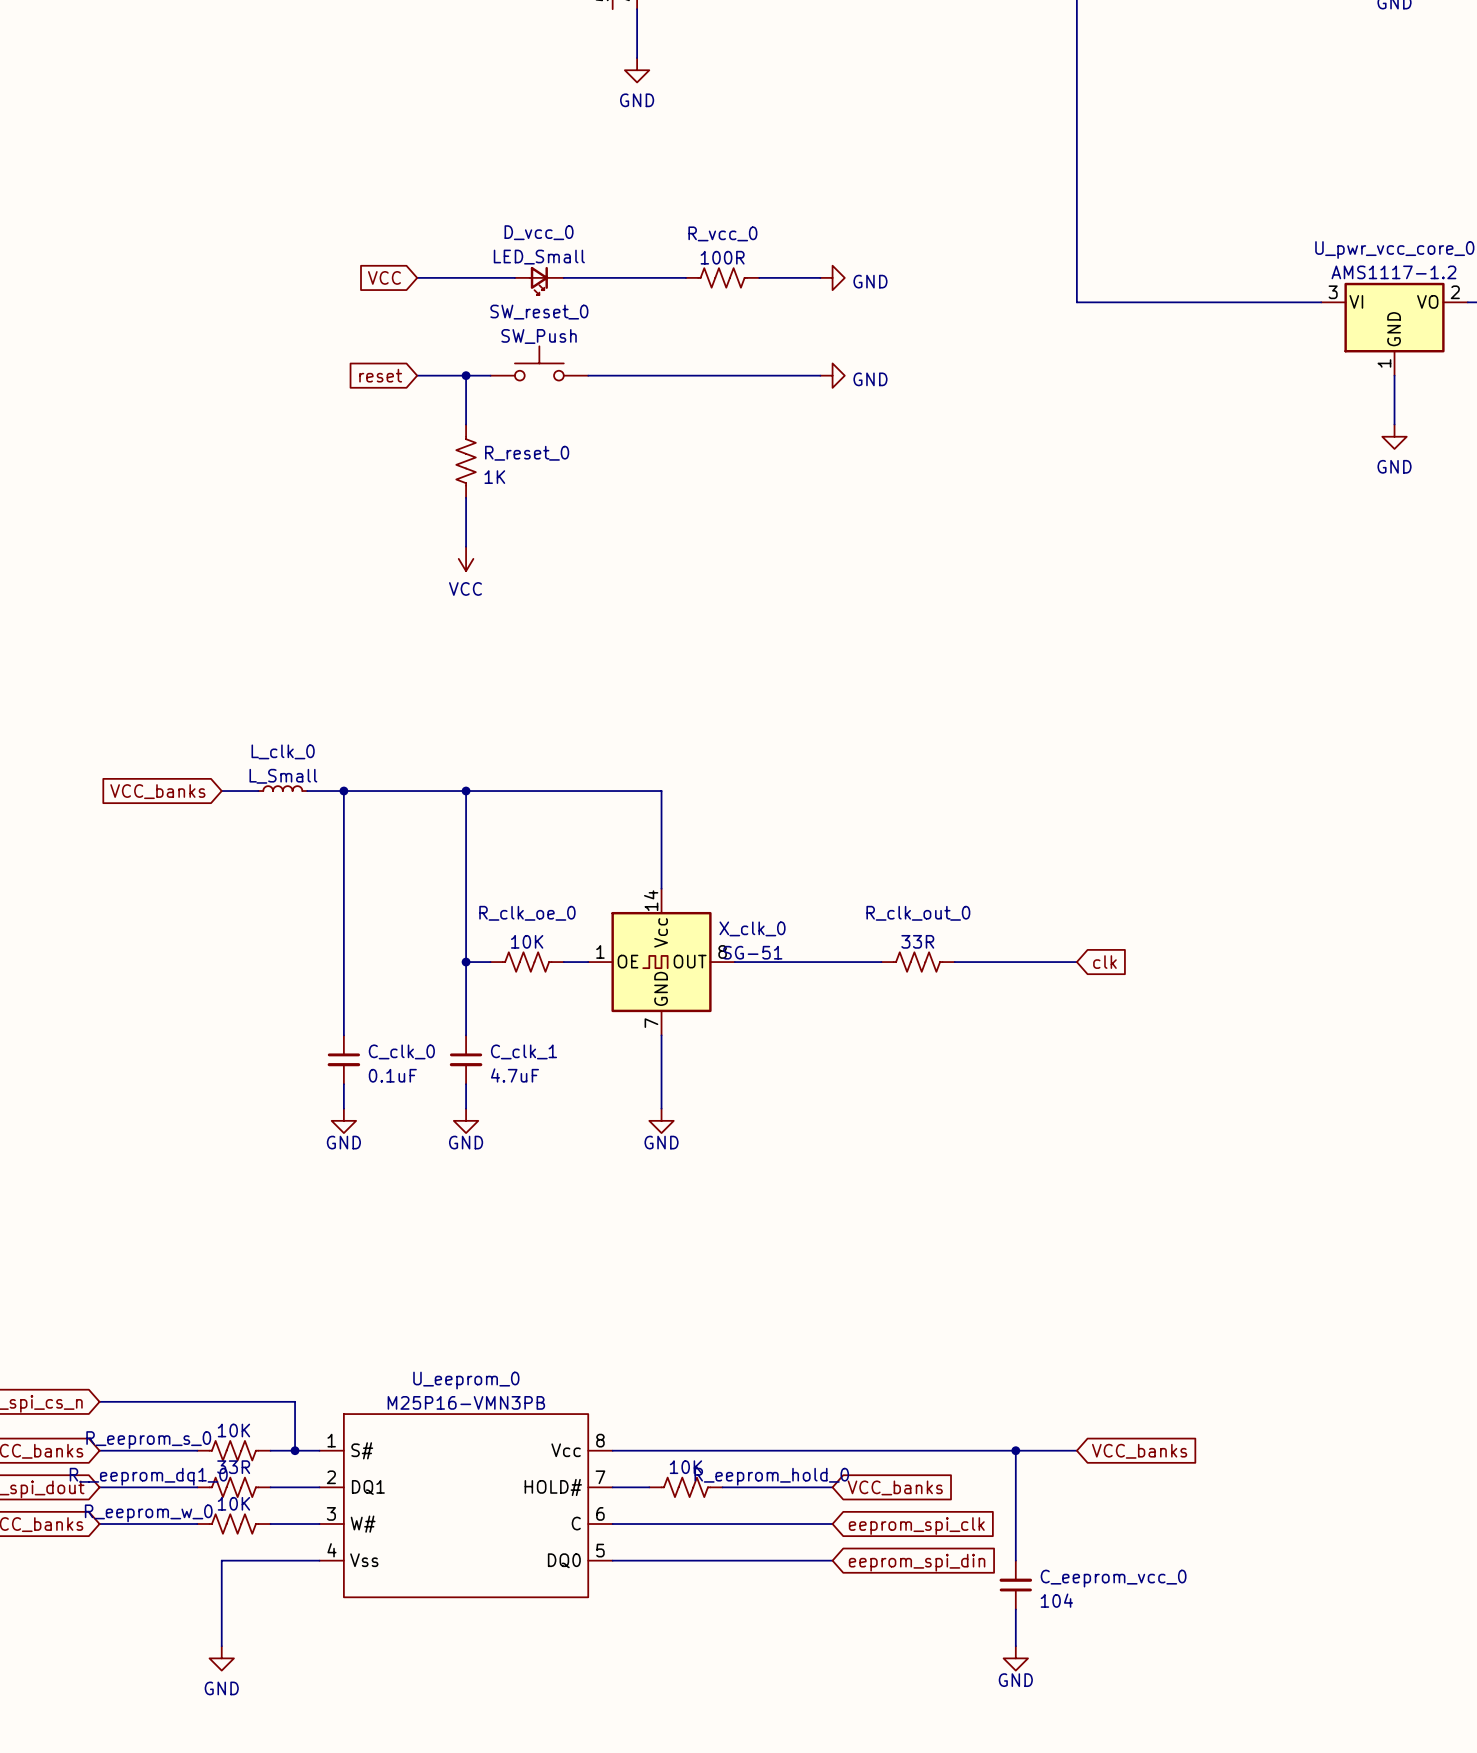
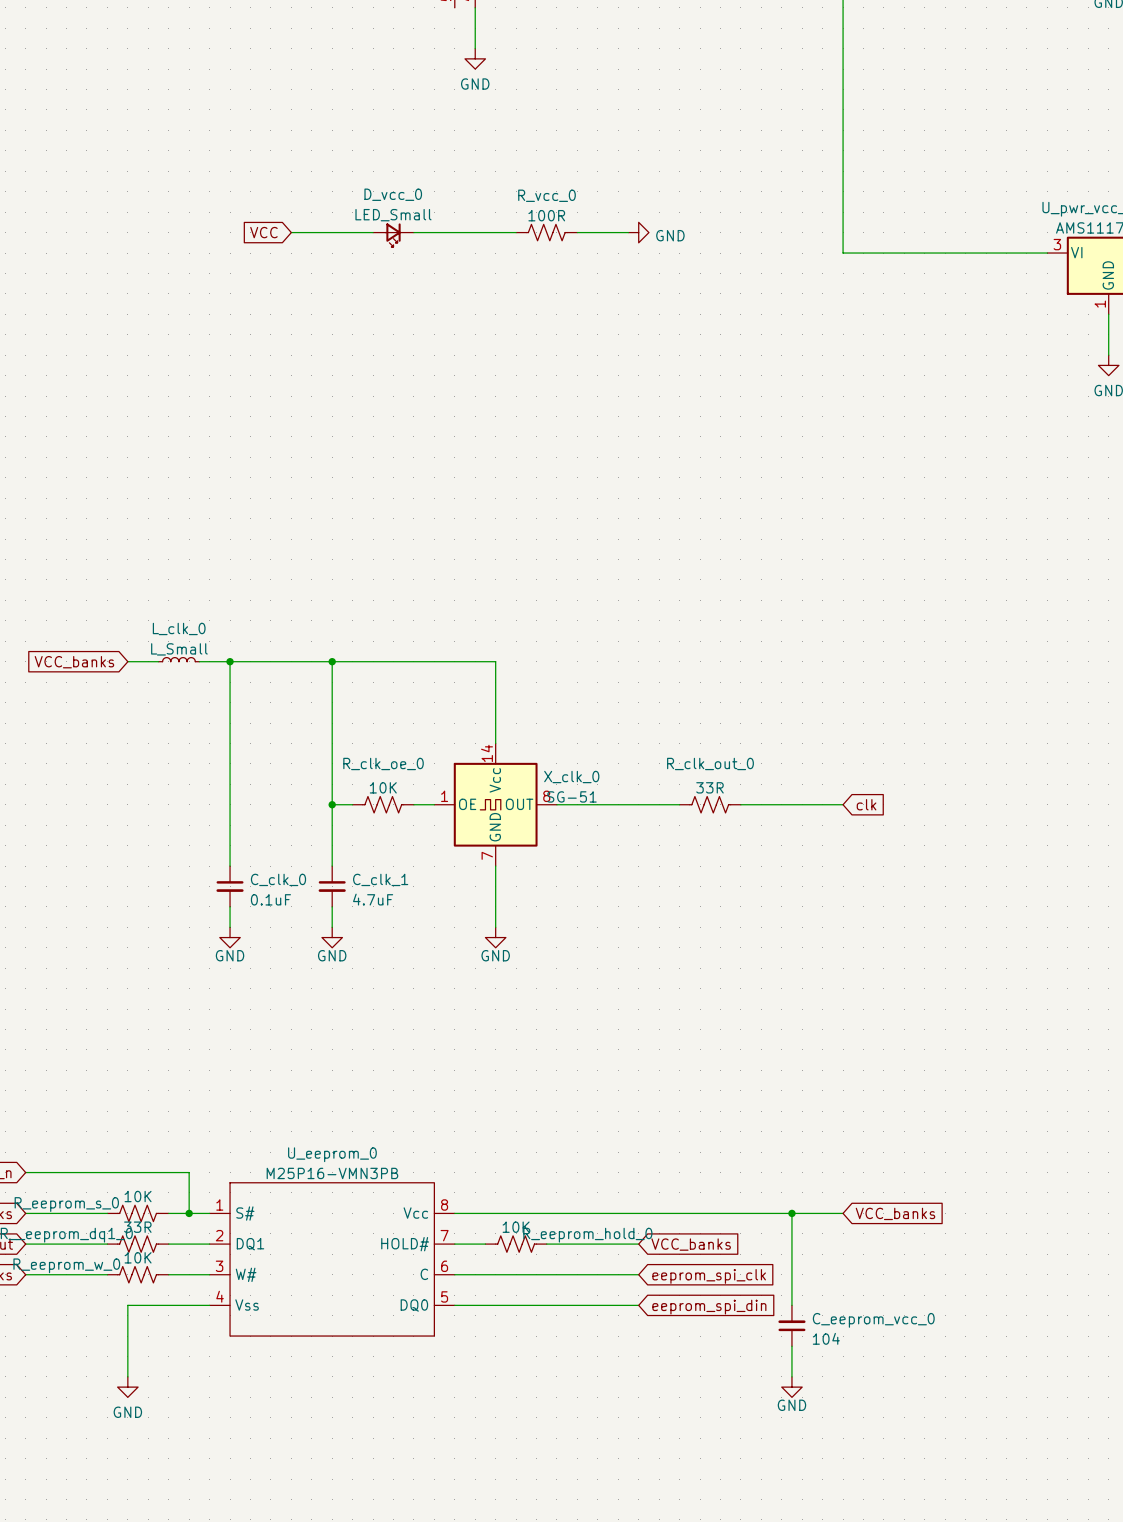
SW_reset_0: SW_Push (539, 363) -> none
global label: reset (380, 375) -> none
wire: (417, 375) (490, 375) -> none
wire: (466, 375) (466, 424) -> none
junction: (466, 375) -> none
wire: (588, 375) (820, 375) -> none
power symbol: GND (832, 375) -> none
R_reset_0: 1K (466, 461) -> none
wire: (466, 497) (466, 546) -> none
power symbol: VCC (466, 558) -> none

